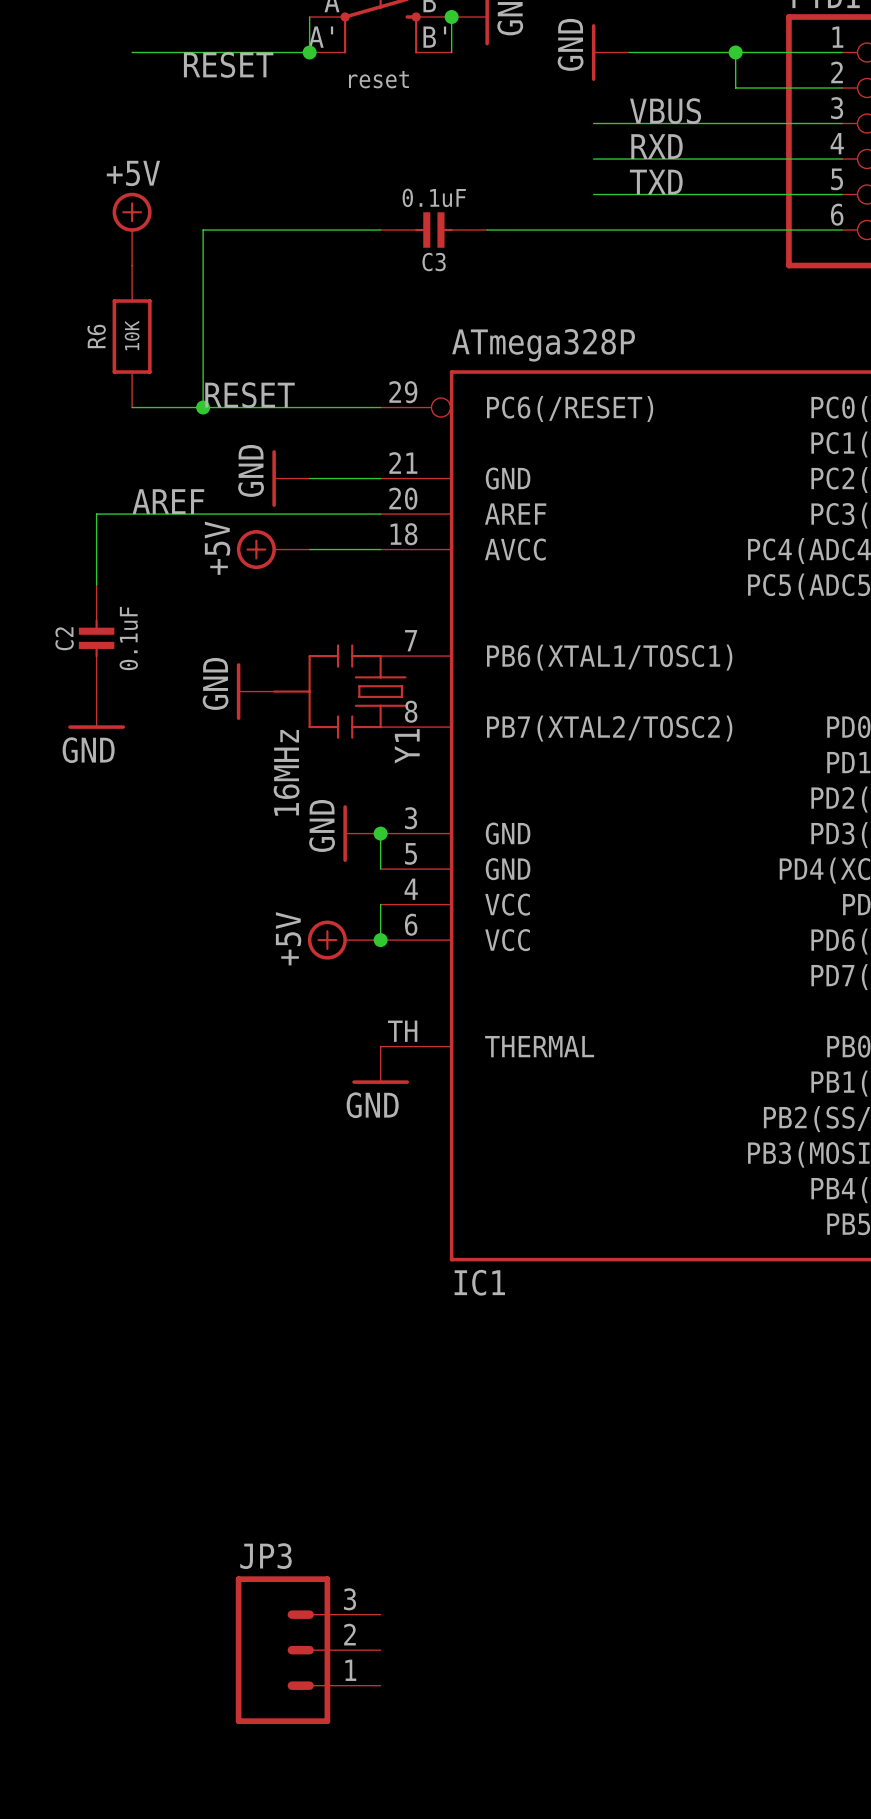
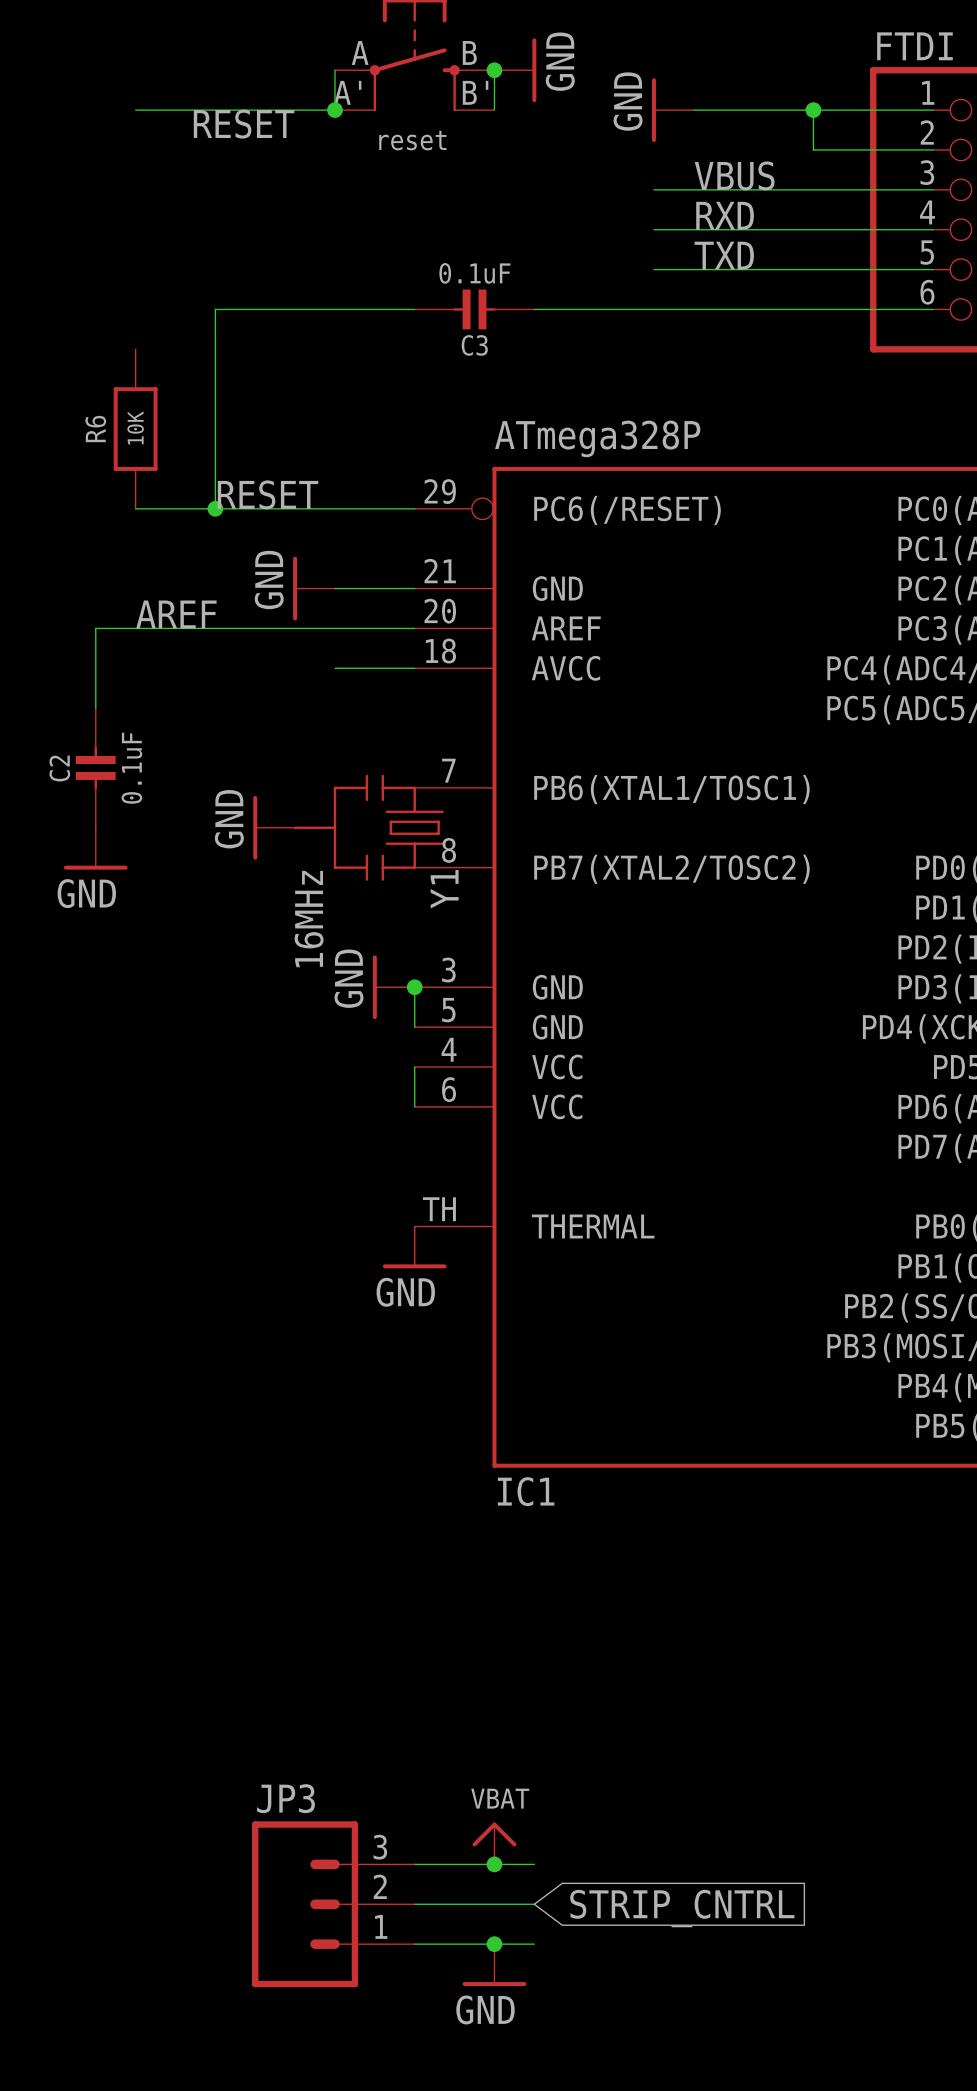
power symbol: +5V (132, 229) -> none
power symbol: +5V (273, 549) -> none
power symbol: +5V (344, 940) -> none
junction: (380, 940) -> none
power symbol: none -> VBAT (494, 1843)
wire: none -> (414, 1864) (534, 1864)
junction: none -> (494, 1864)
wire: none -> (414, 1904) (534, 1904)
global label: none -> STRIP_CNTRL (682, 1908)
wire: none -> (414, 1944) (534, 1944)
junction: none -> (494, 1944)
power symbol: none -> GND (494, 1965)

